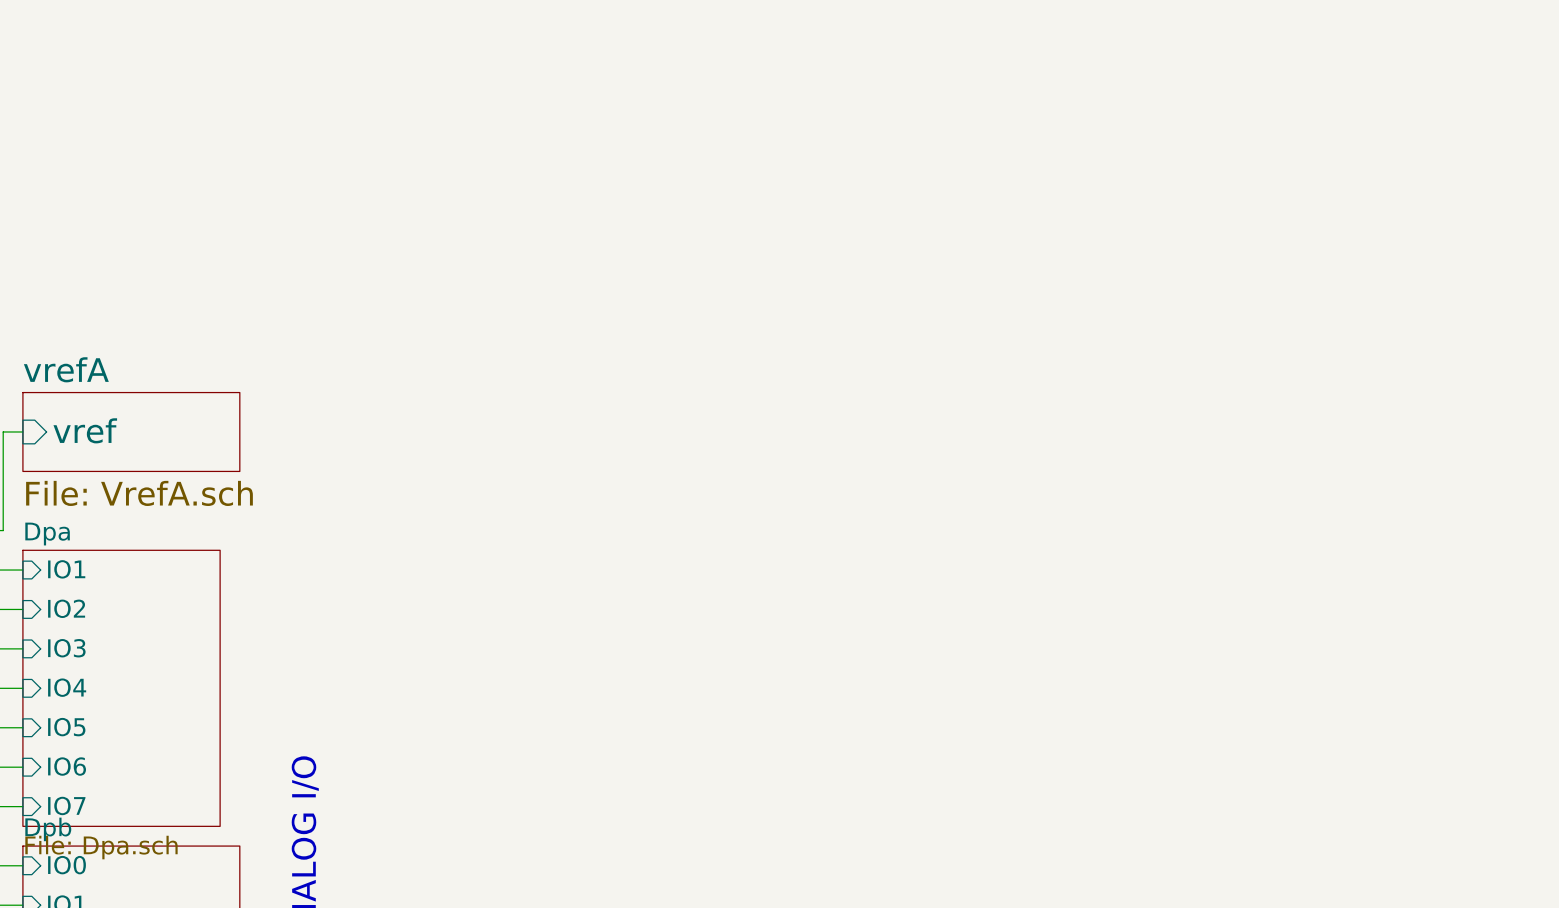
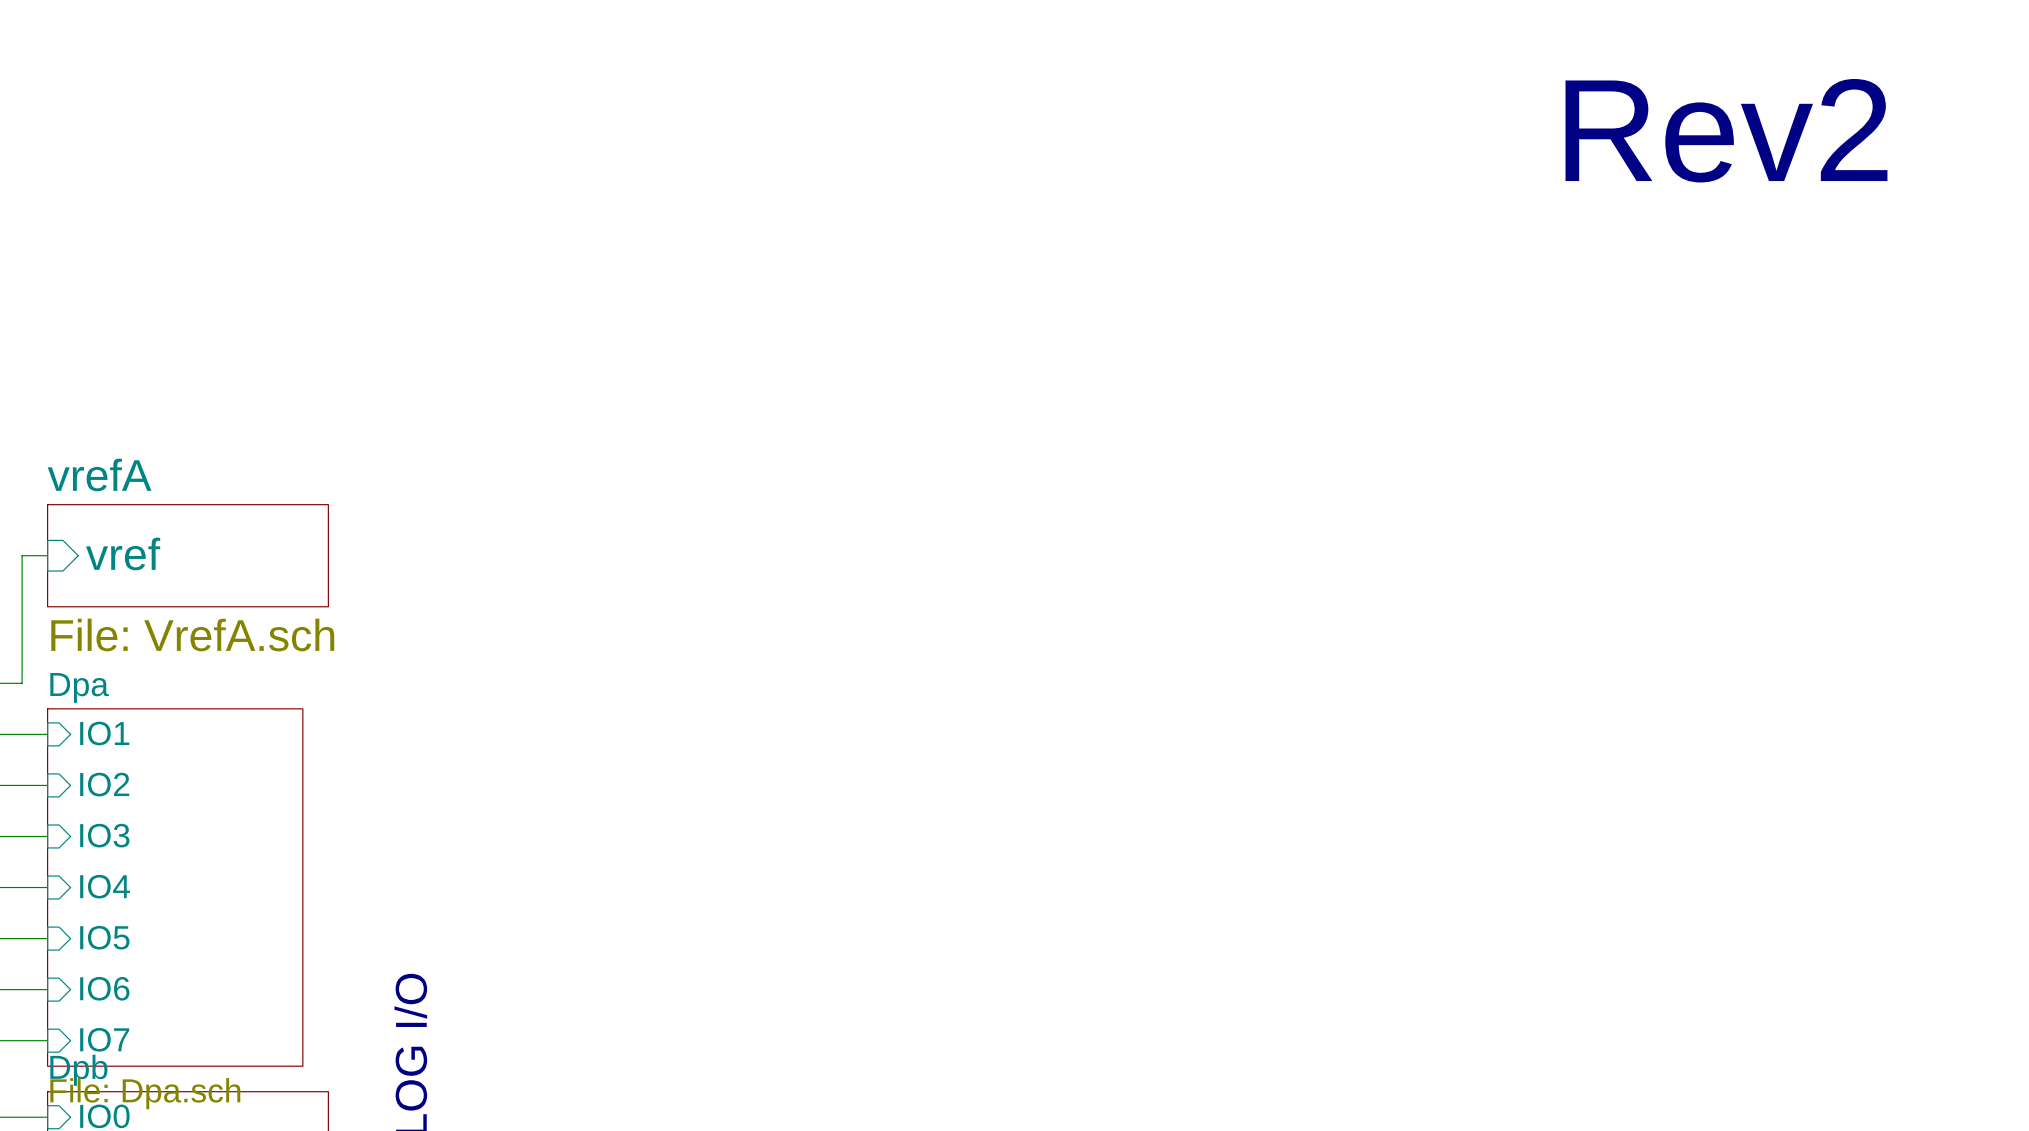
text: none -> Rev2 (1726, 130)

